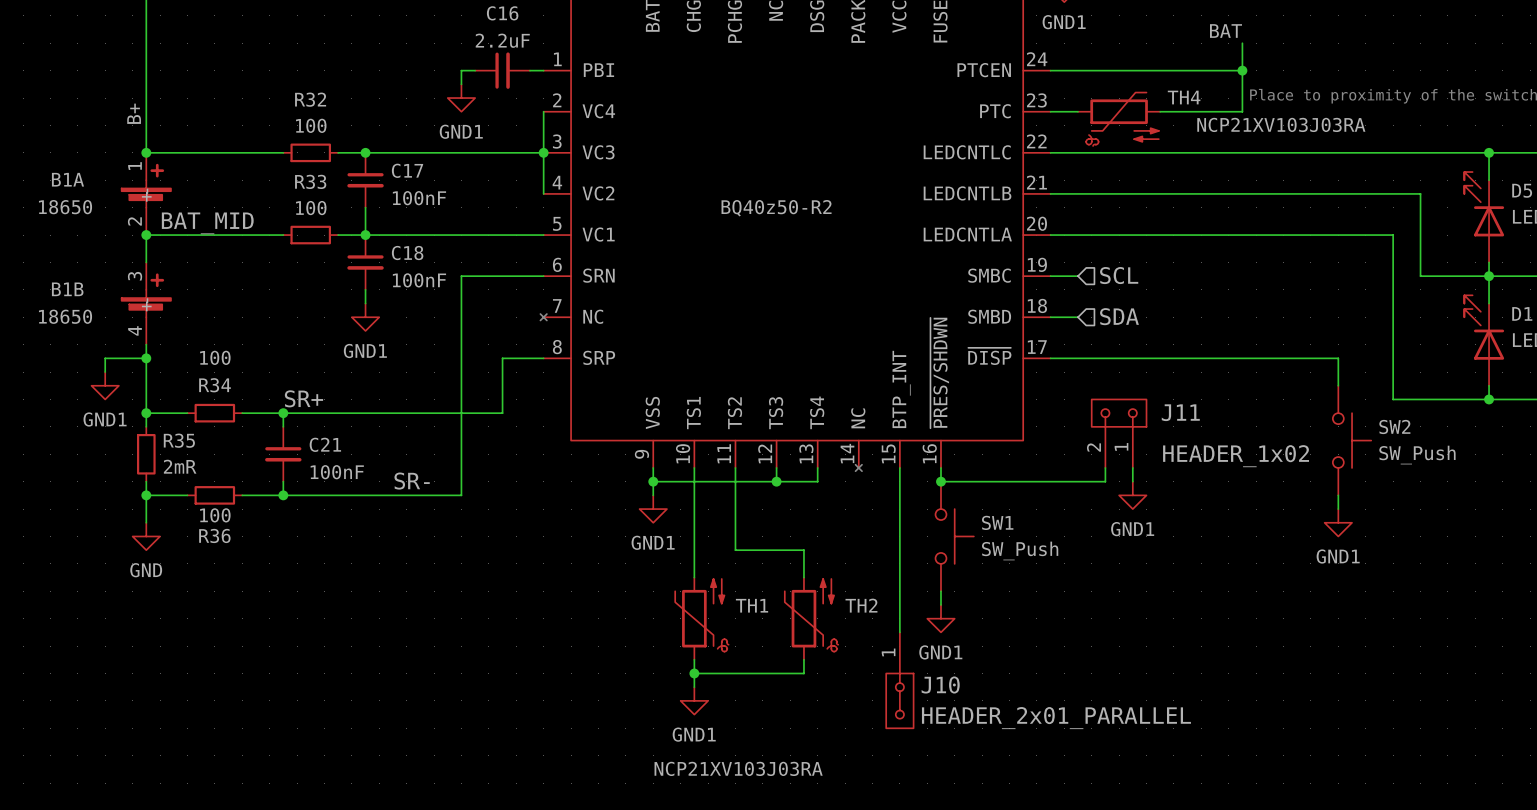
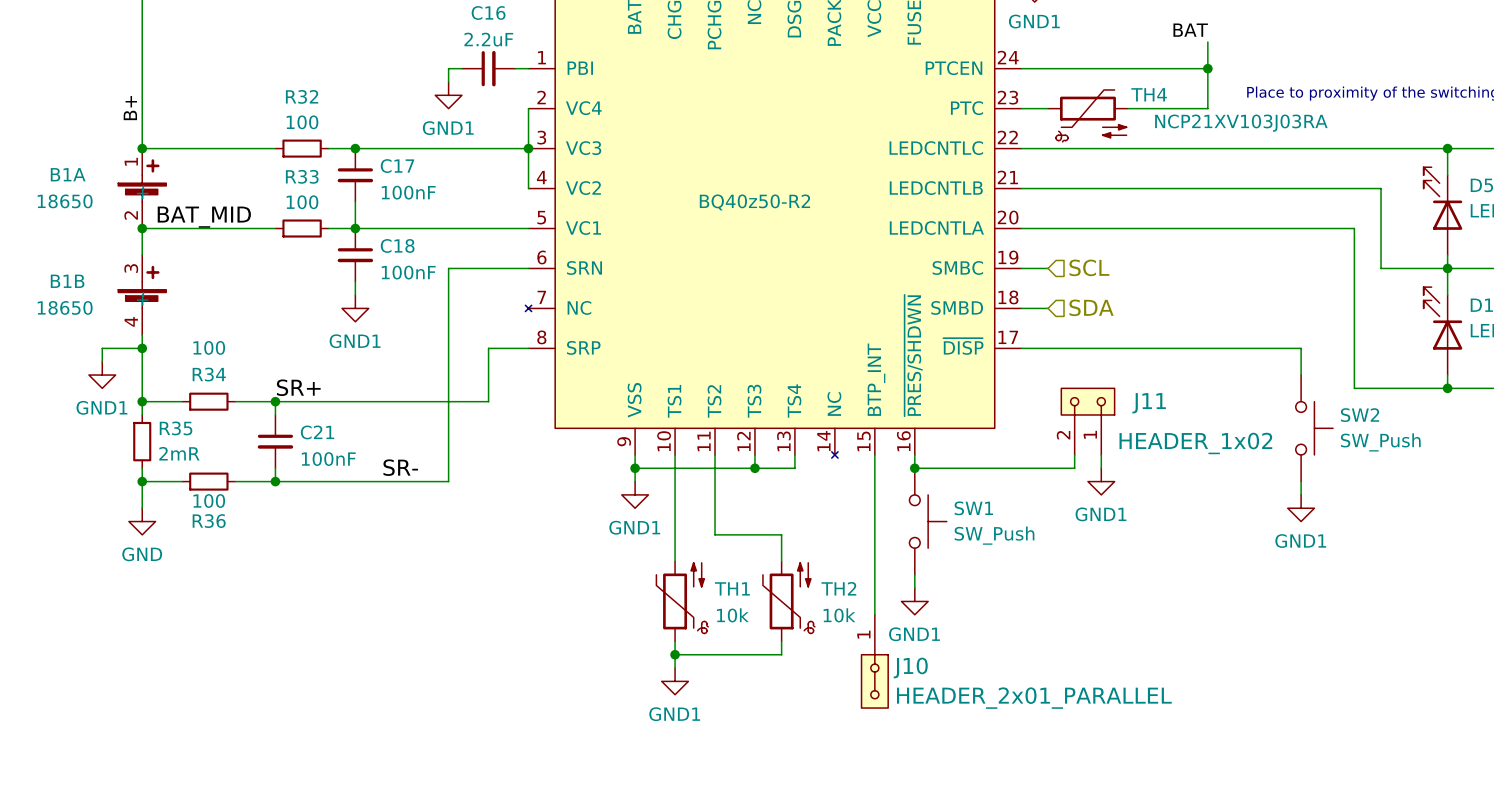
TH2 value: none -> 10k (839, 615)
TH1 value: NCP21XV103J03RA (738, 768) -> 10k (732, 615)

